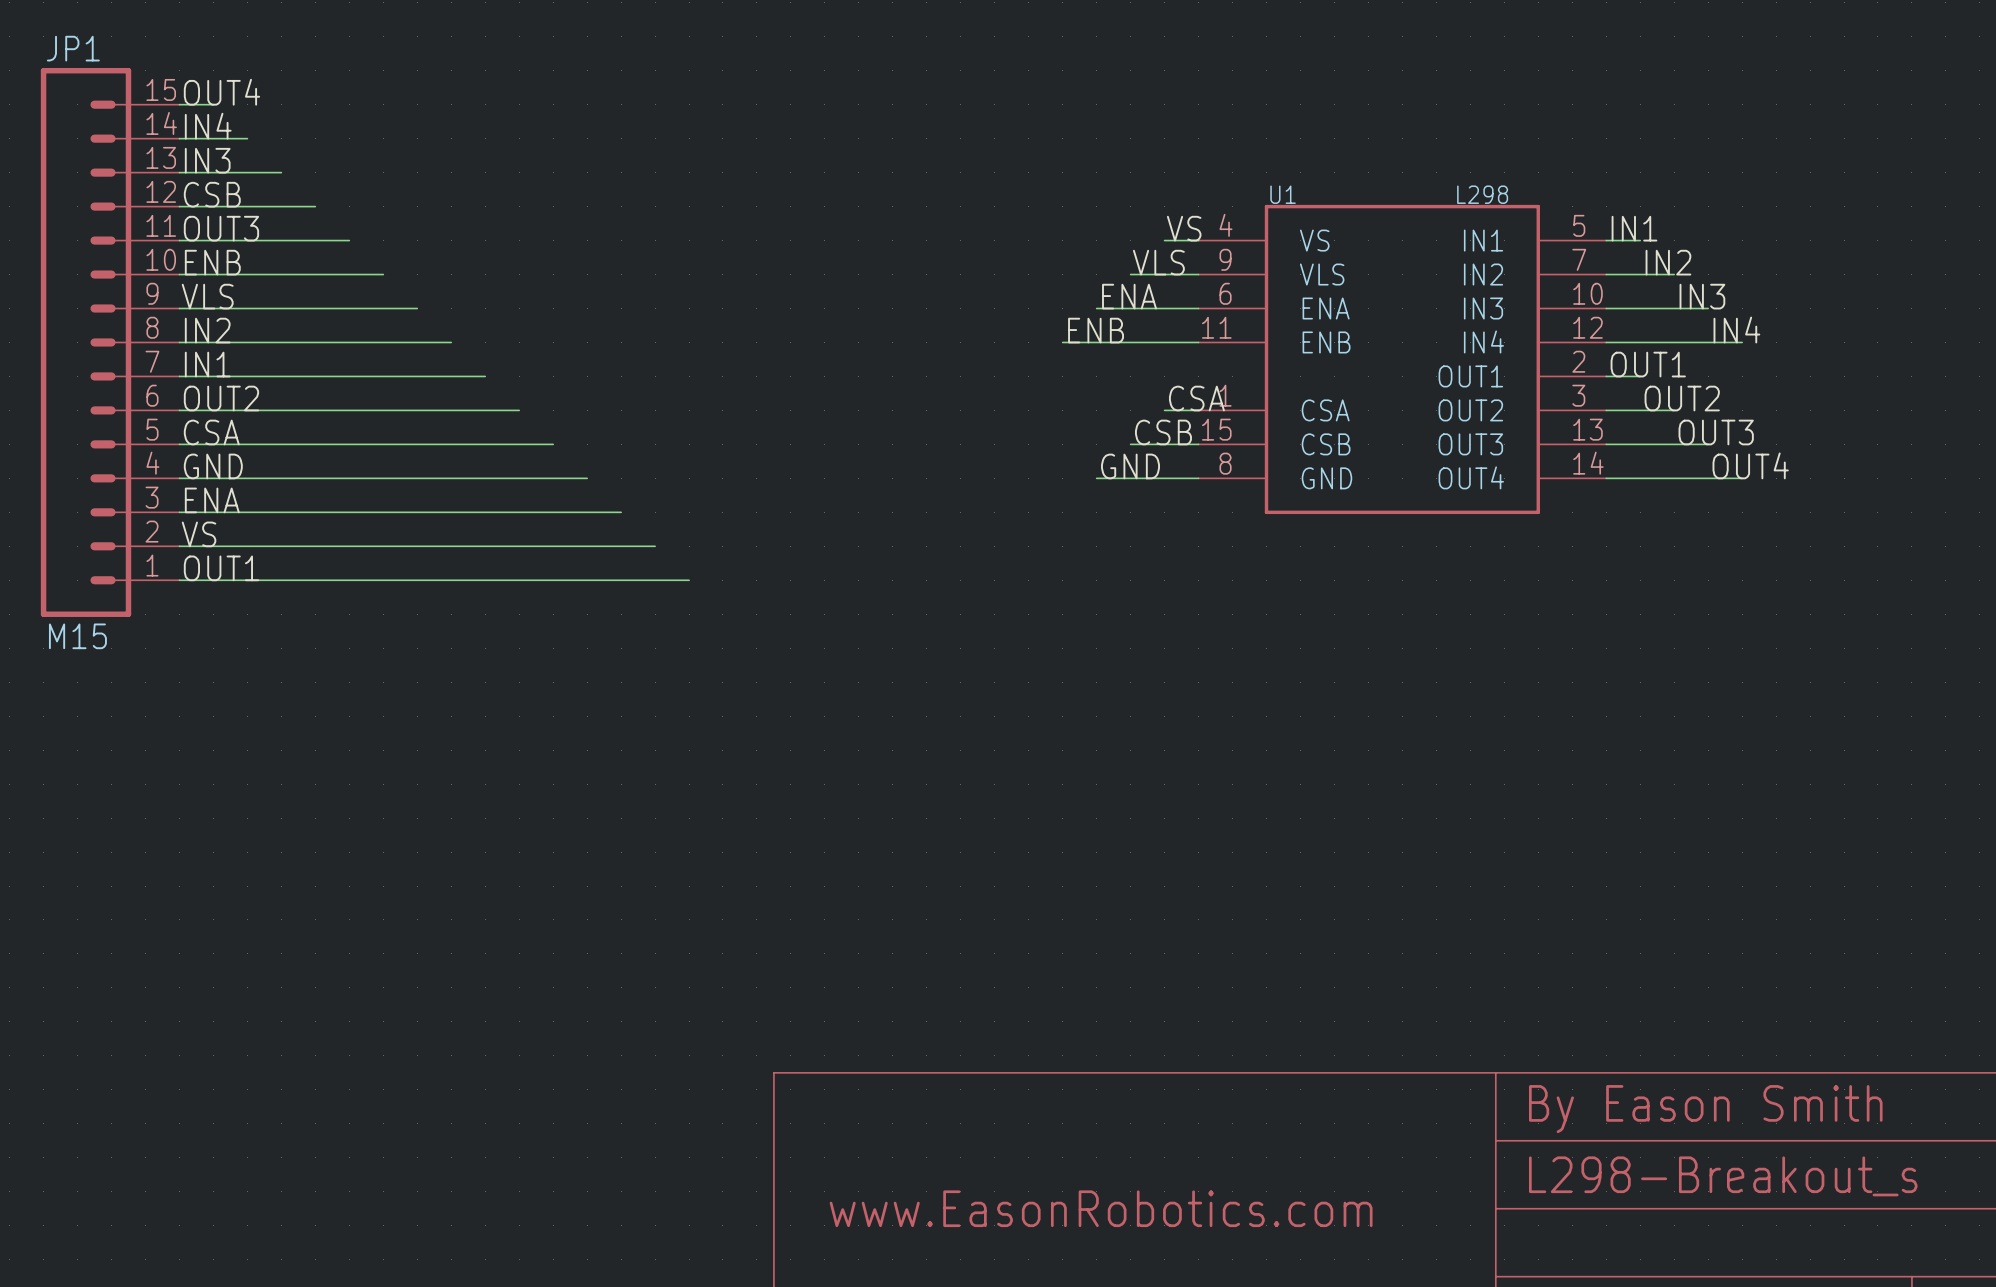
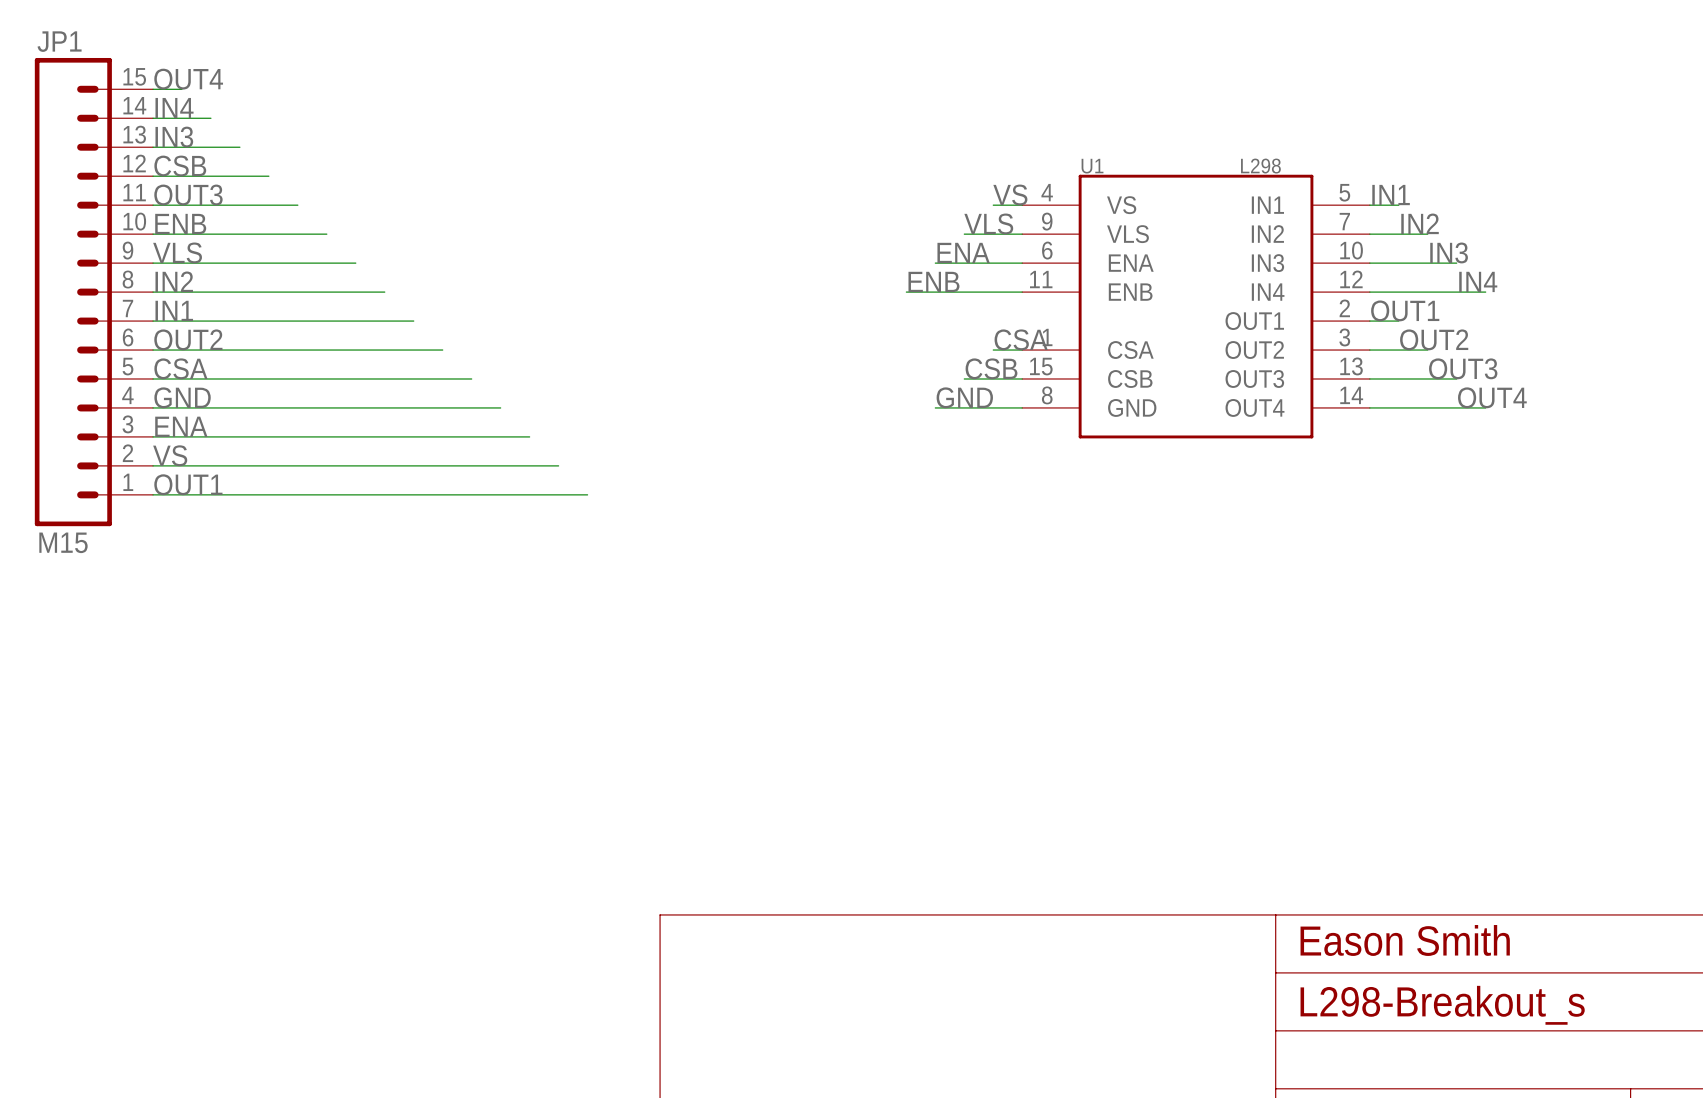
text: By Eason Smith (1705, 1109) -> Eason Smith (1405, 940)
text: www.EasonRobotics.com (1101, 1208) -> none

